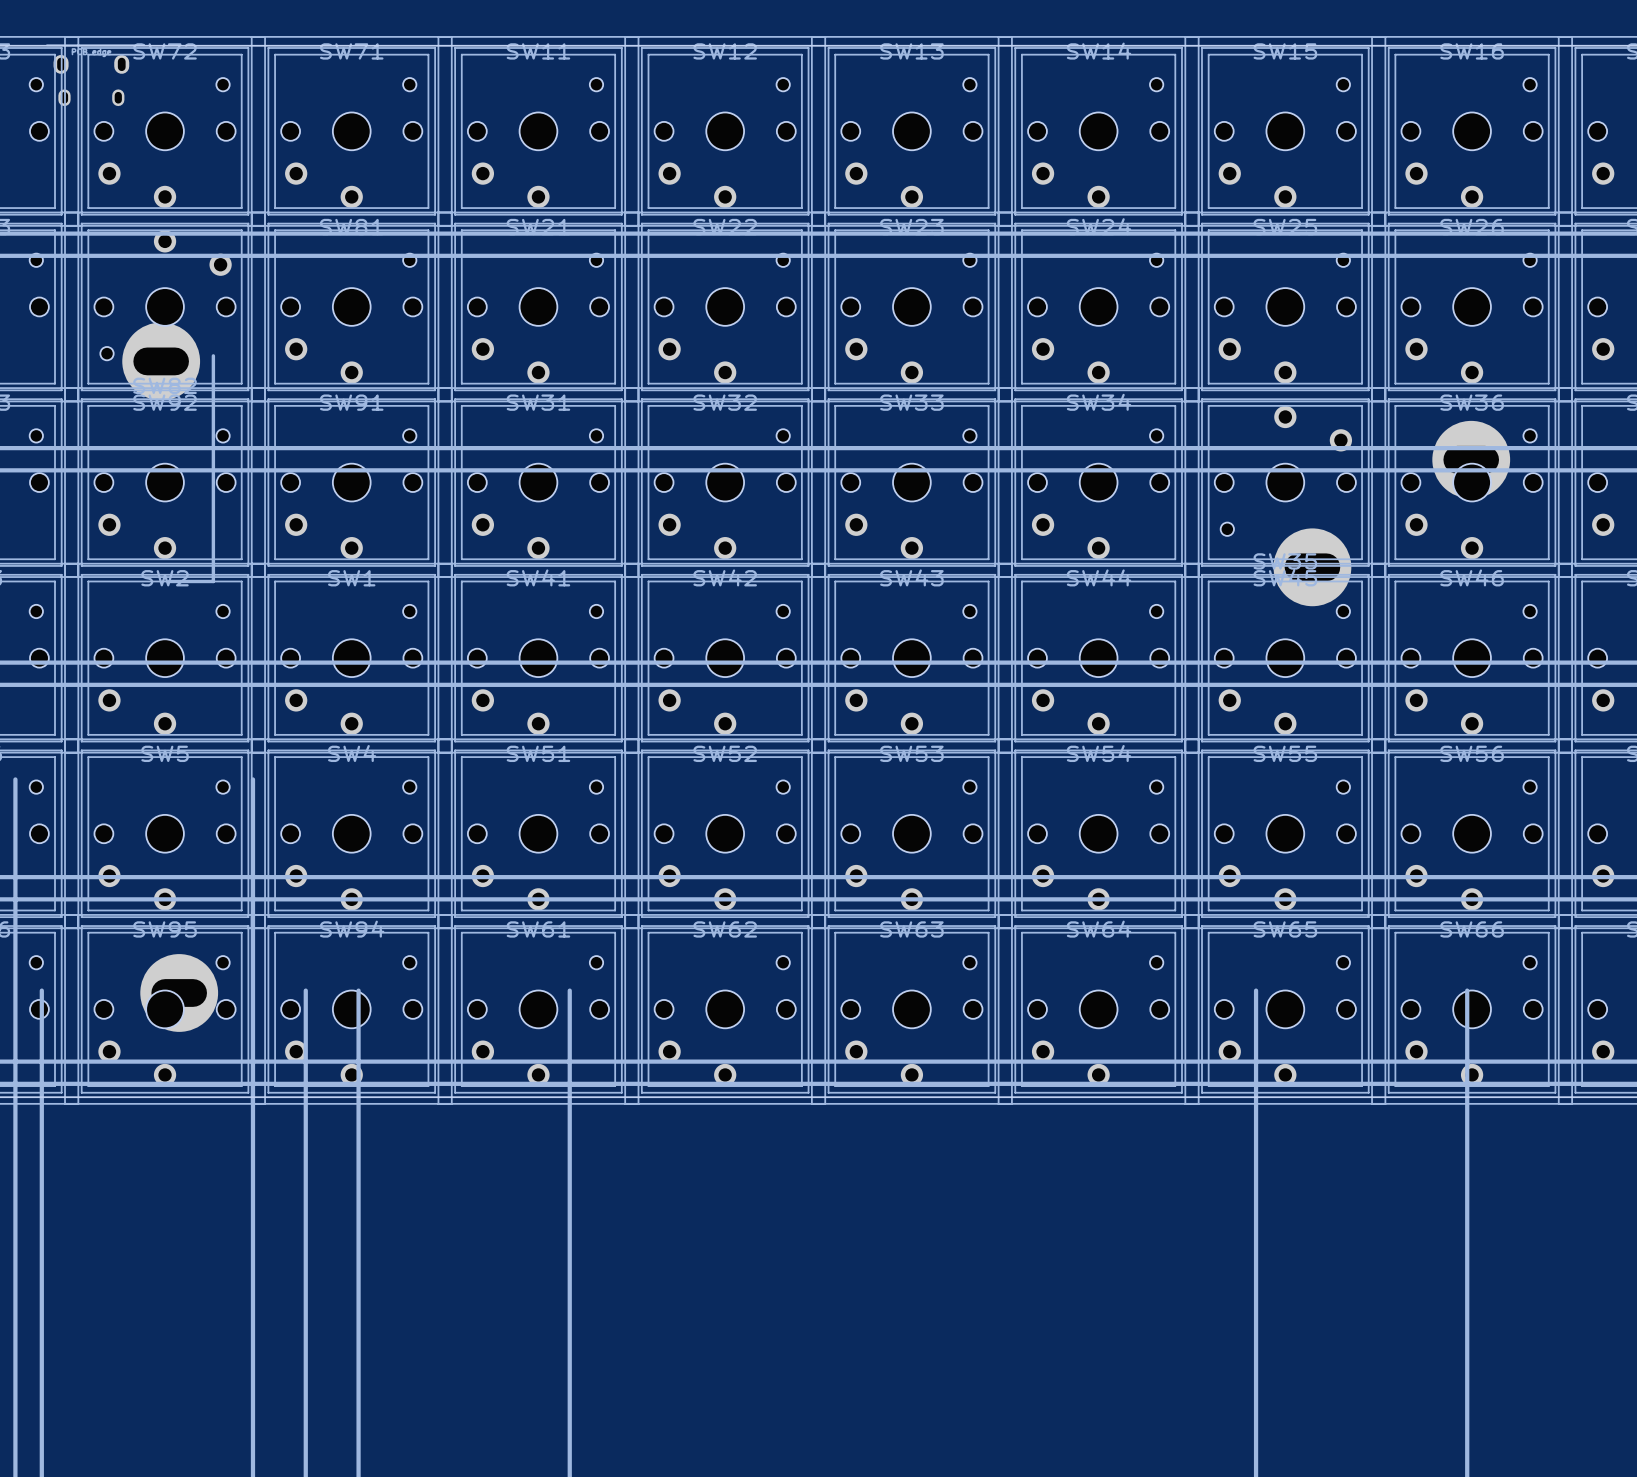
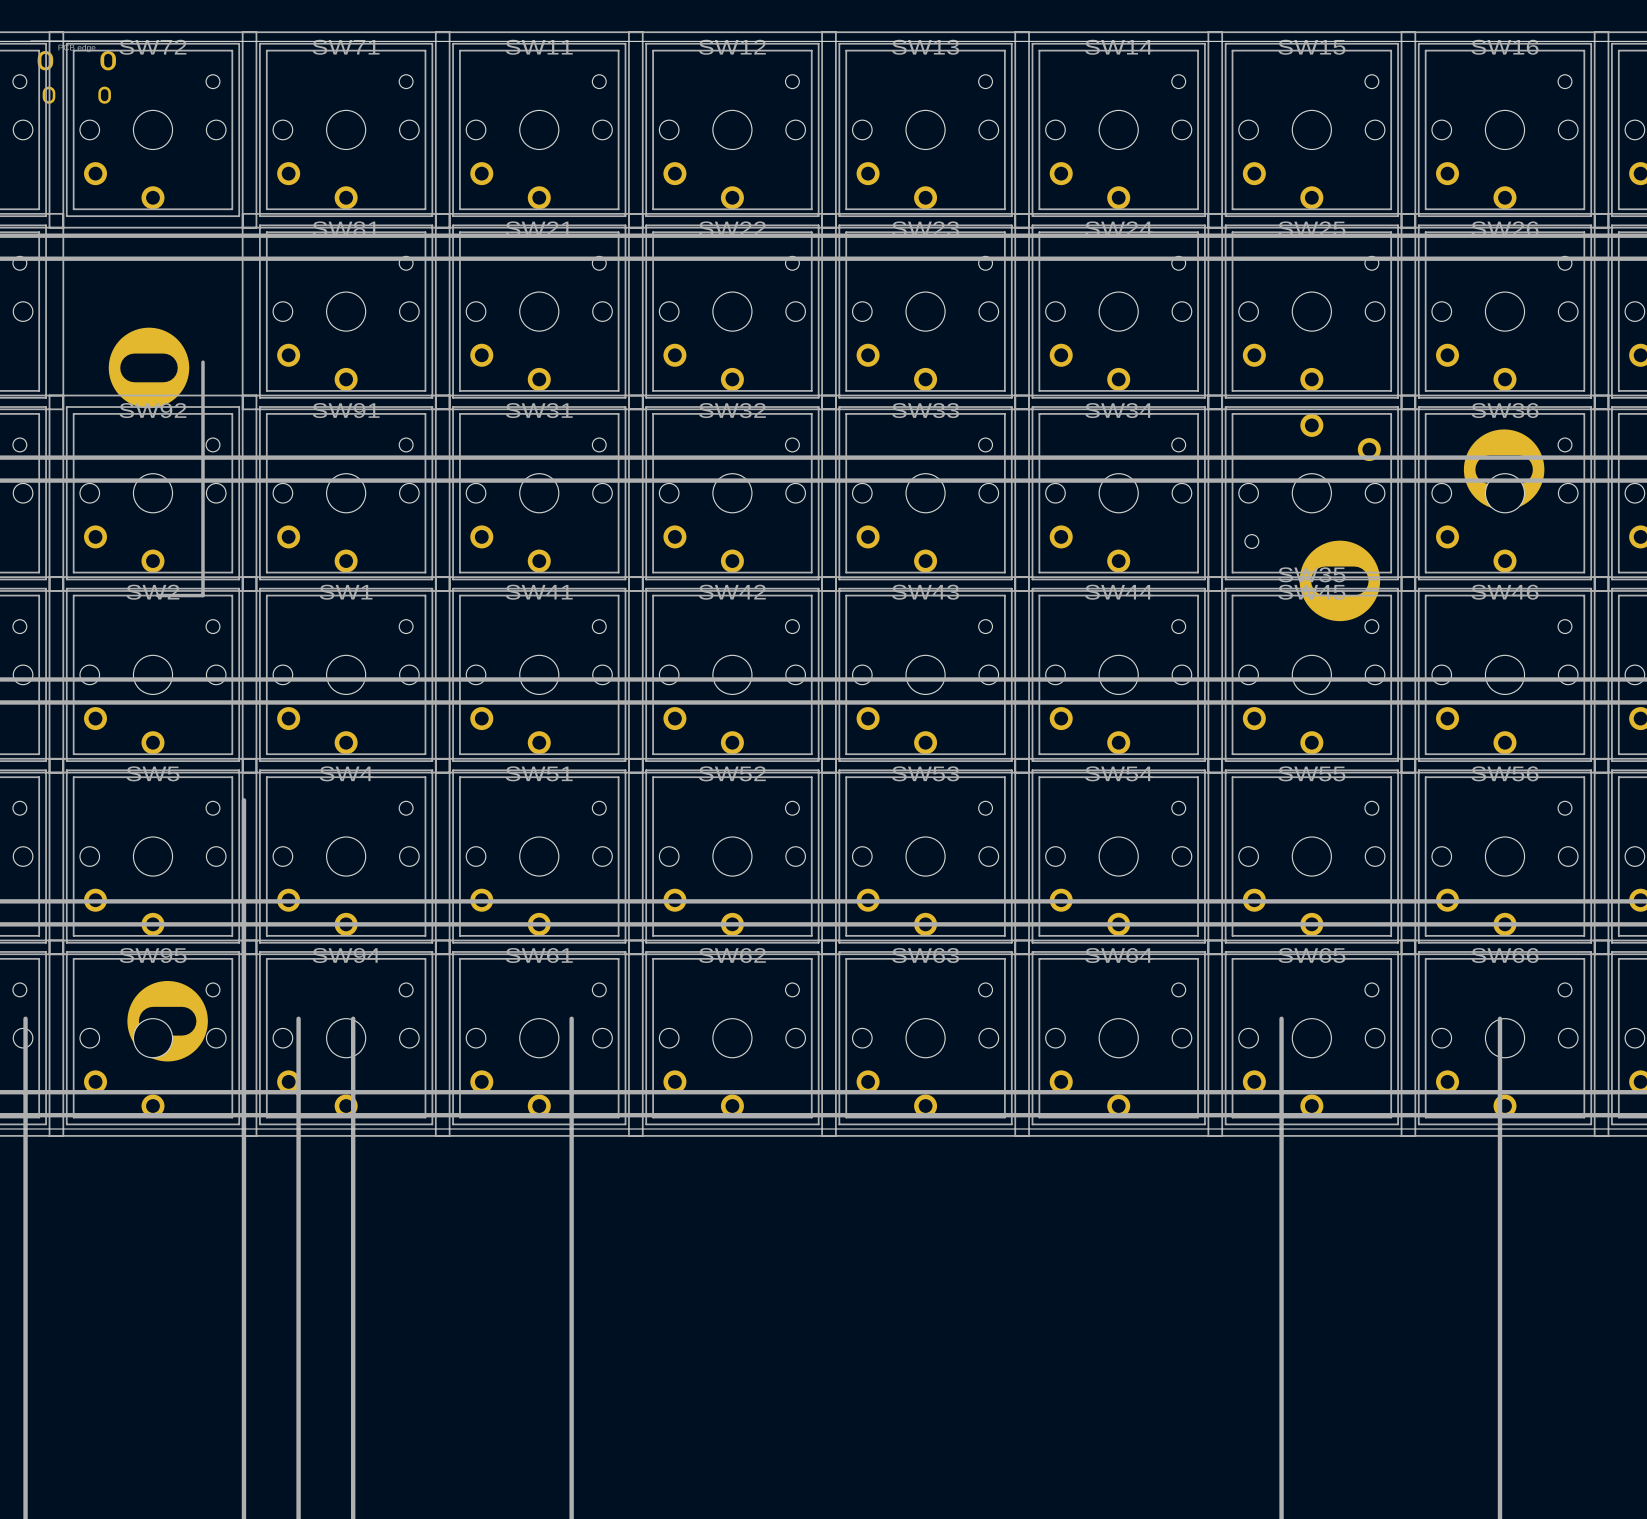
part: (165, 306) -> none

